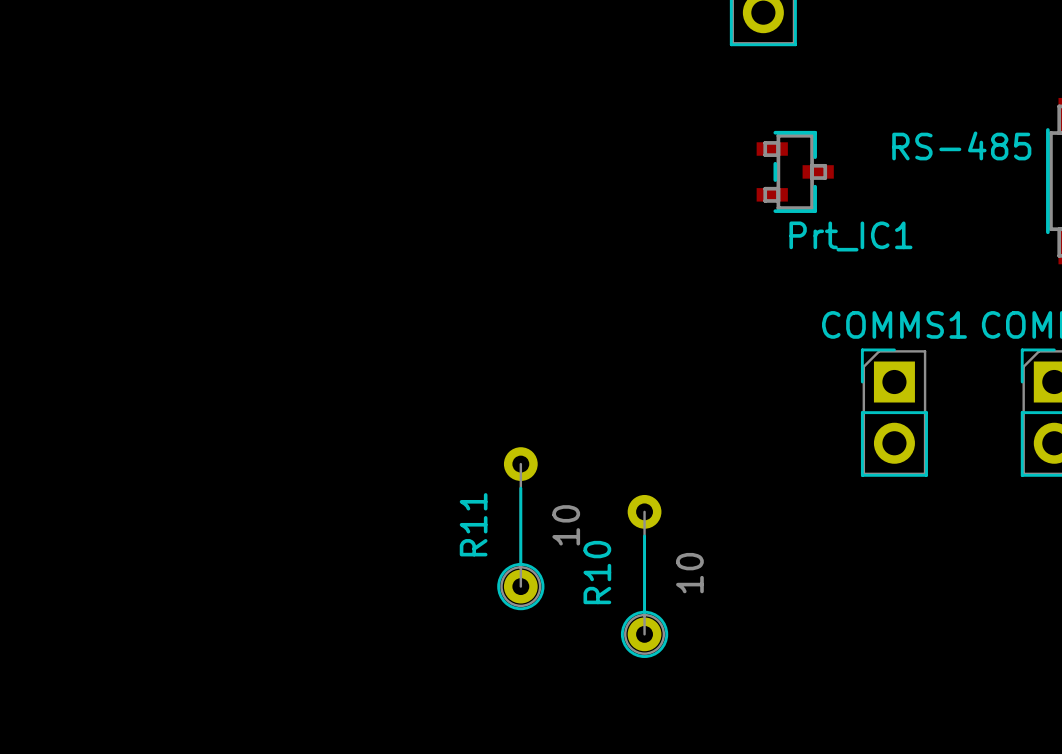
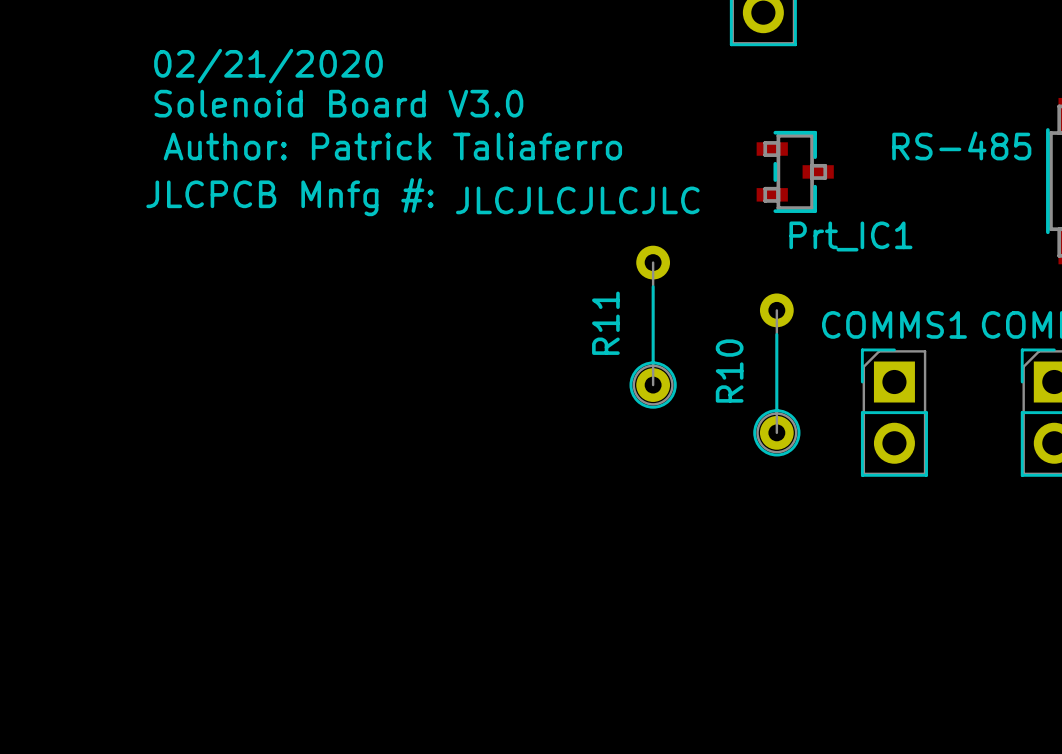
text: none -> 02/21/2020 (268, 66)
text: none -> Solenoid Board V3.0 (338, 103)
text: none -> Author: Patrick Taliaferro (392, 146)
text: none -> JLCPCB Mnfg #: (289, 197)
text: none -> JLCJLCJLCJLC (577, 200)
R11 value: 10 (566, 525) -> none
R11 position: (520, 528) -> (653, 327)
R10 value: 10 (689, 573) -> none
R10 position: (644, 576) -> (776, 374)

